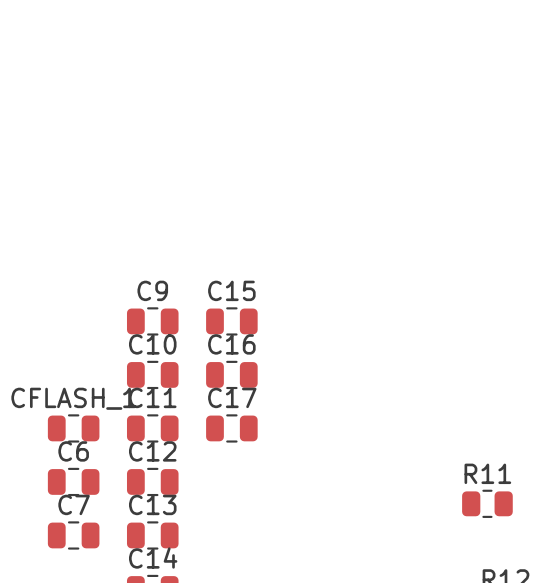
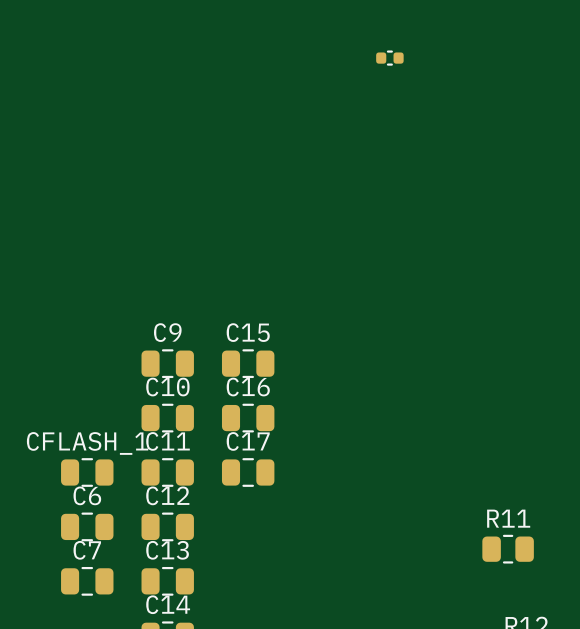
part: none -> (389, 58)

